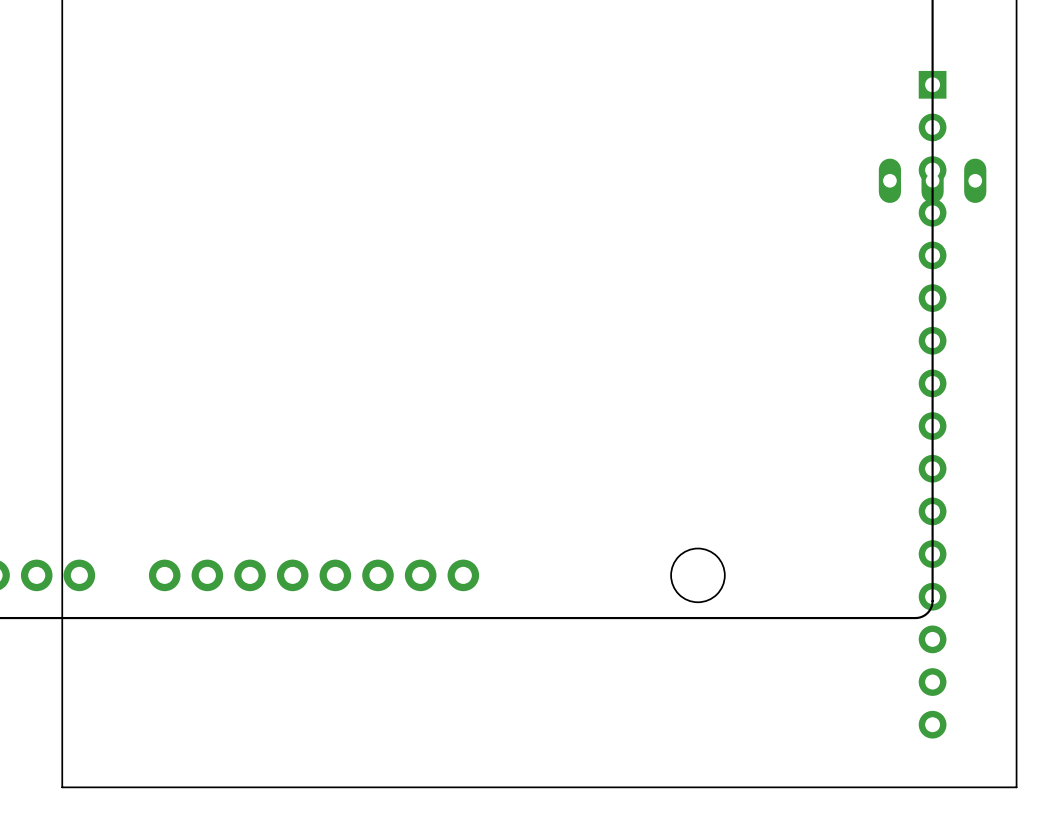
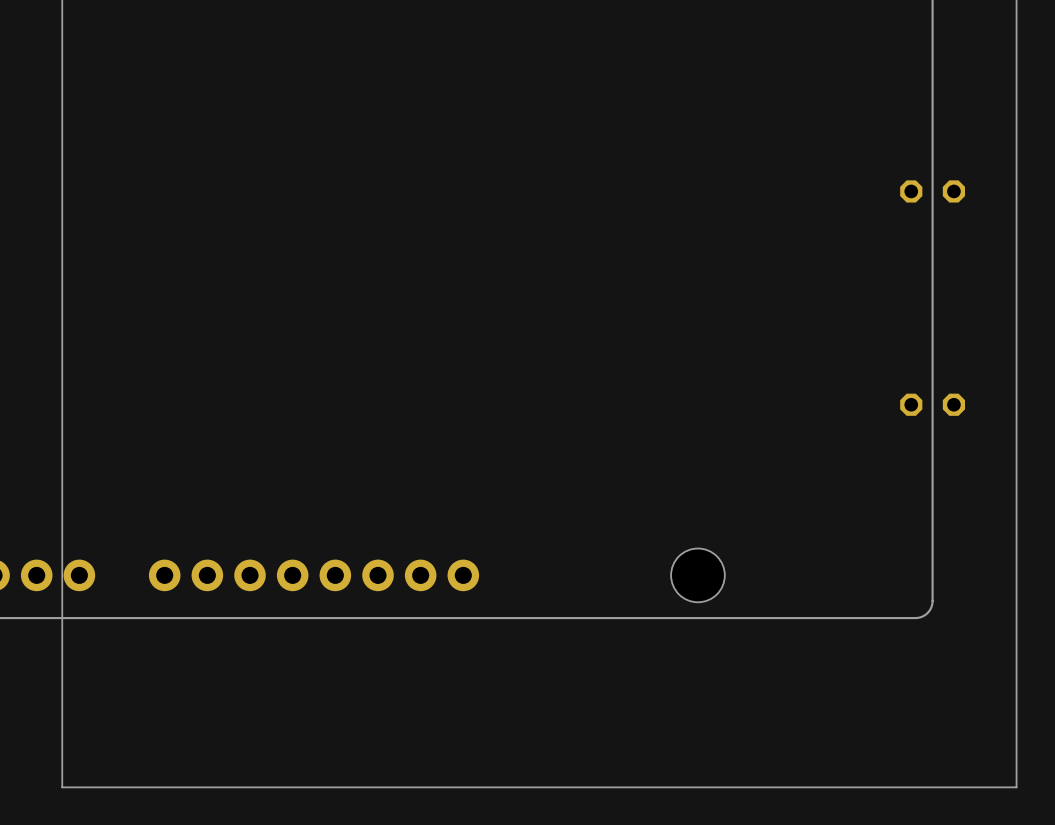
part footprint: [918, 70, 947, 739] -> [900, 393, 966, 416]
part footprint: [878, 158, 987, 203] -> [900, 180, 966, 203]

